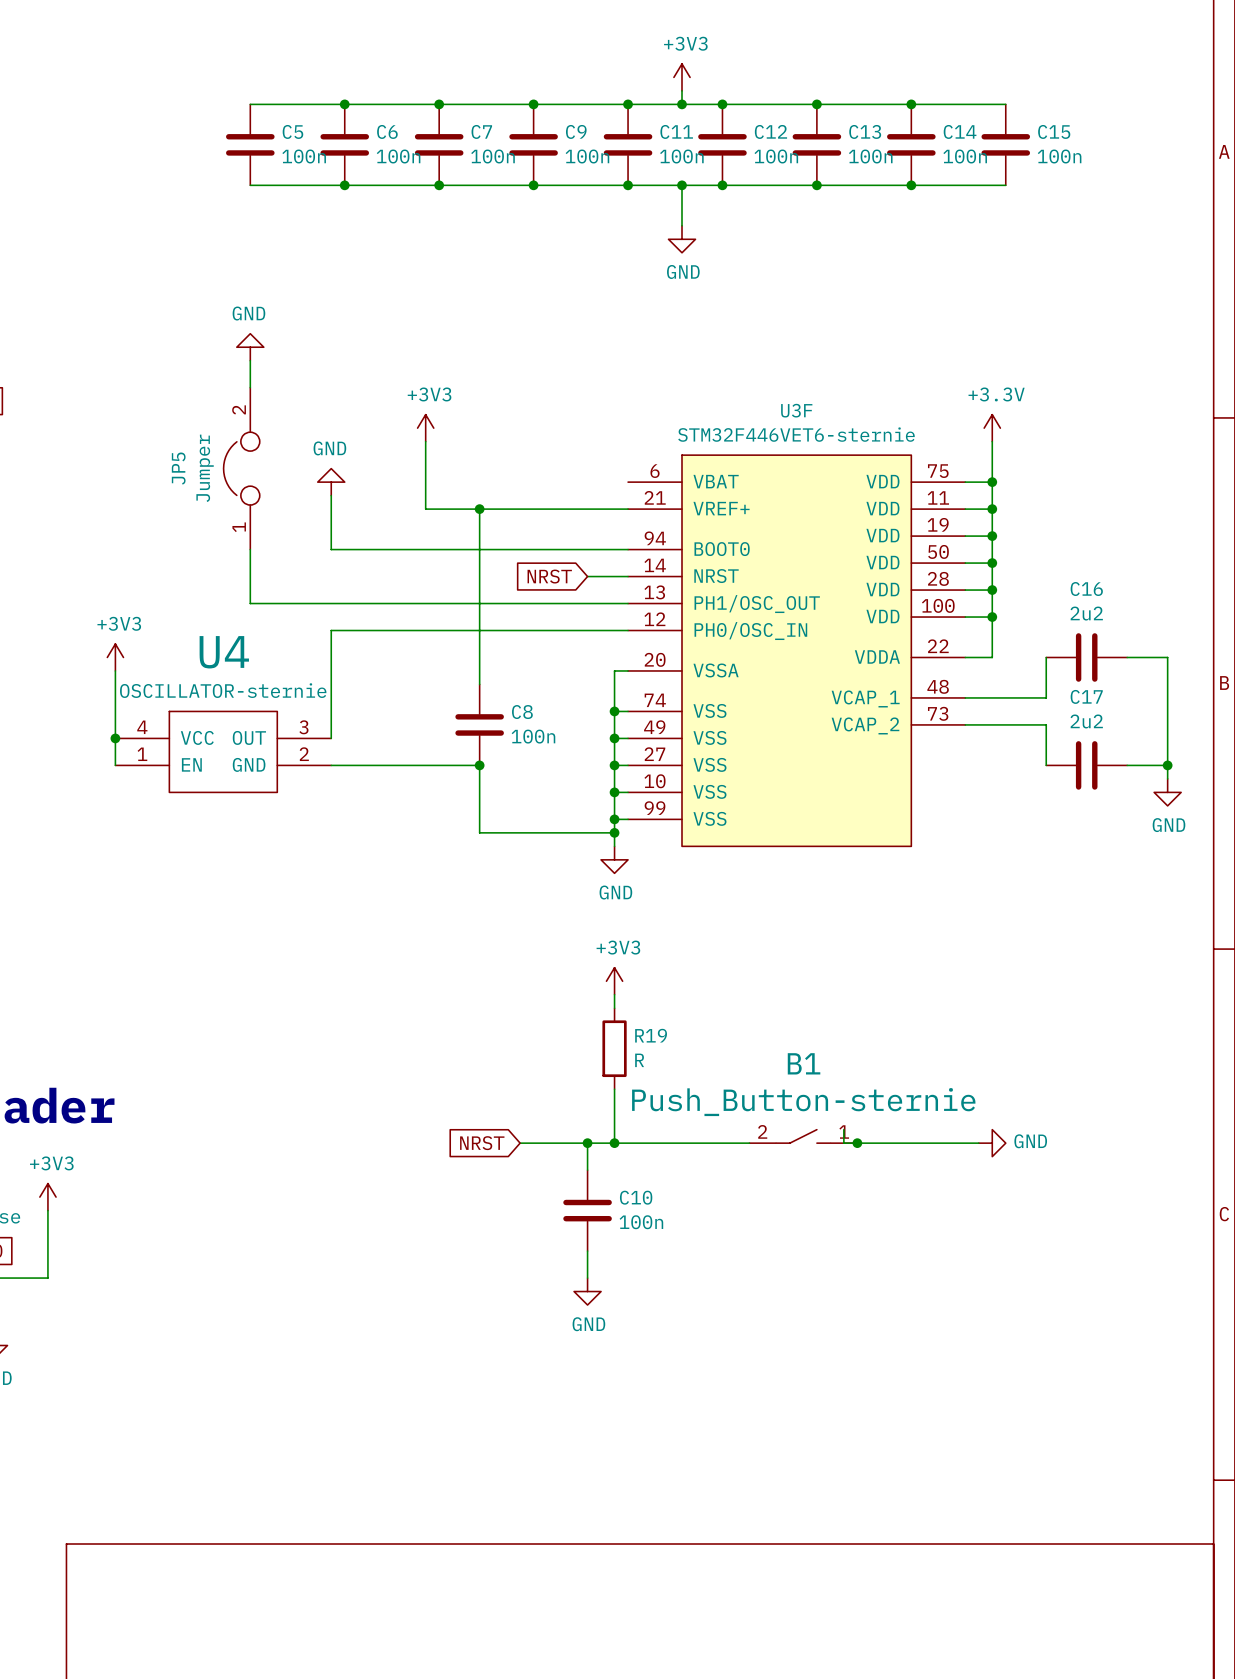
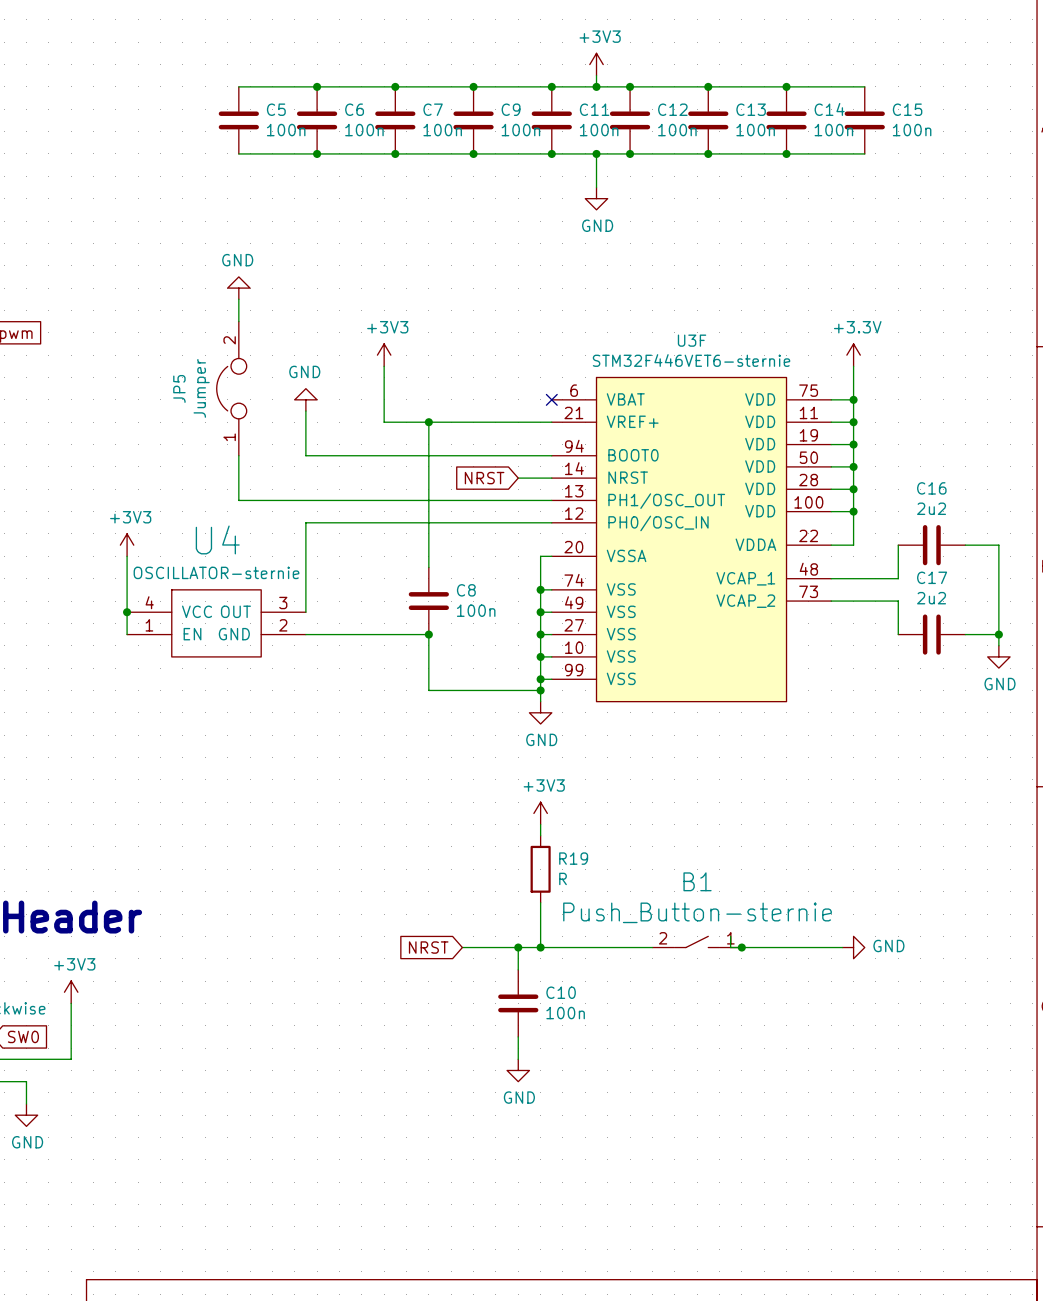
no-connect mark: none -> (551, 399)

